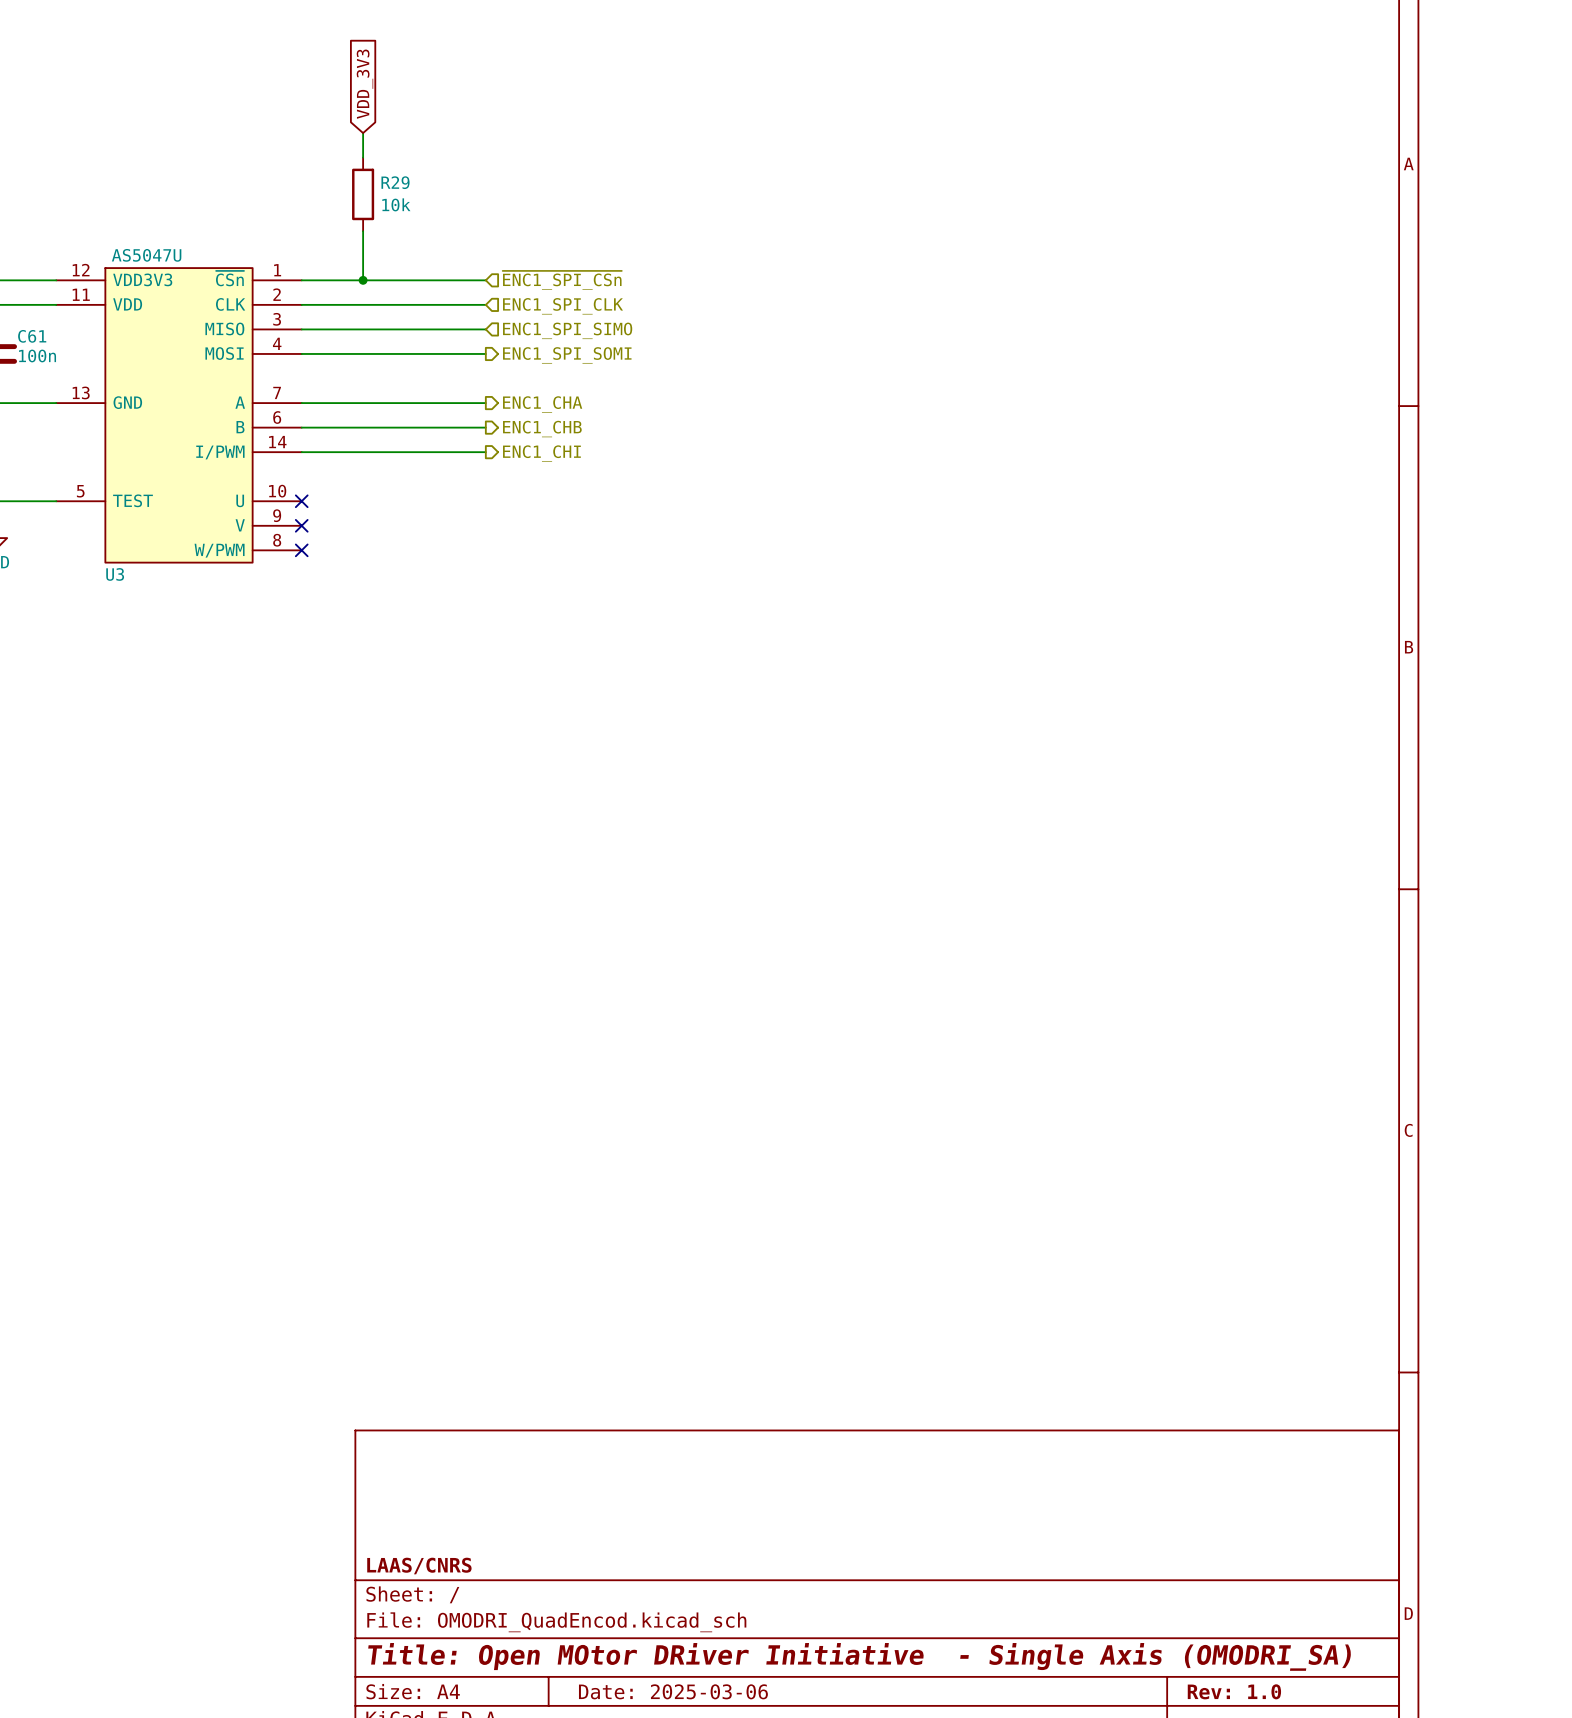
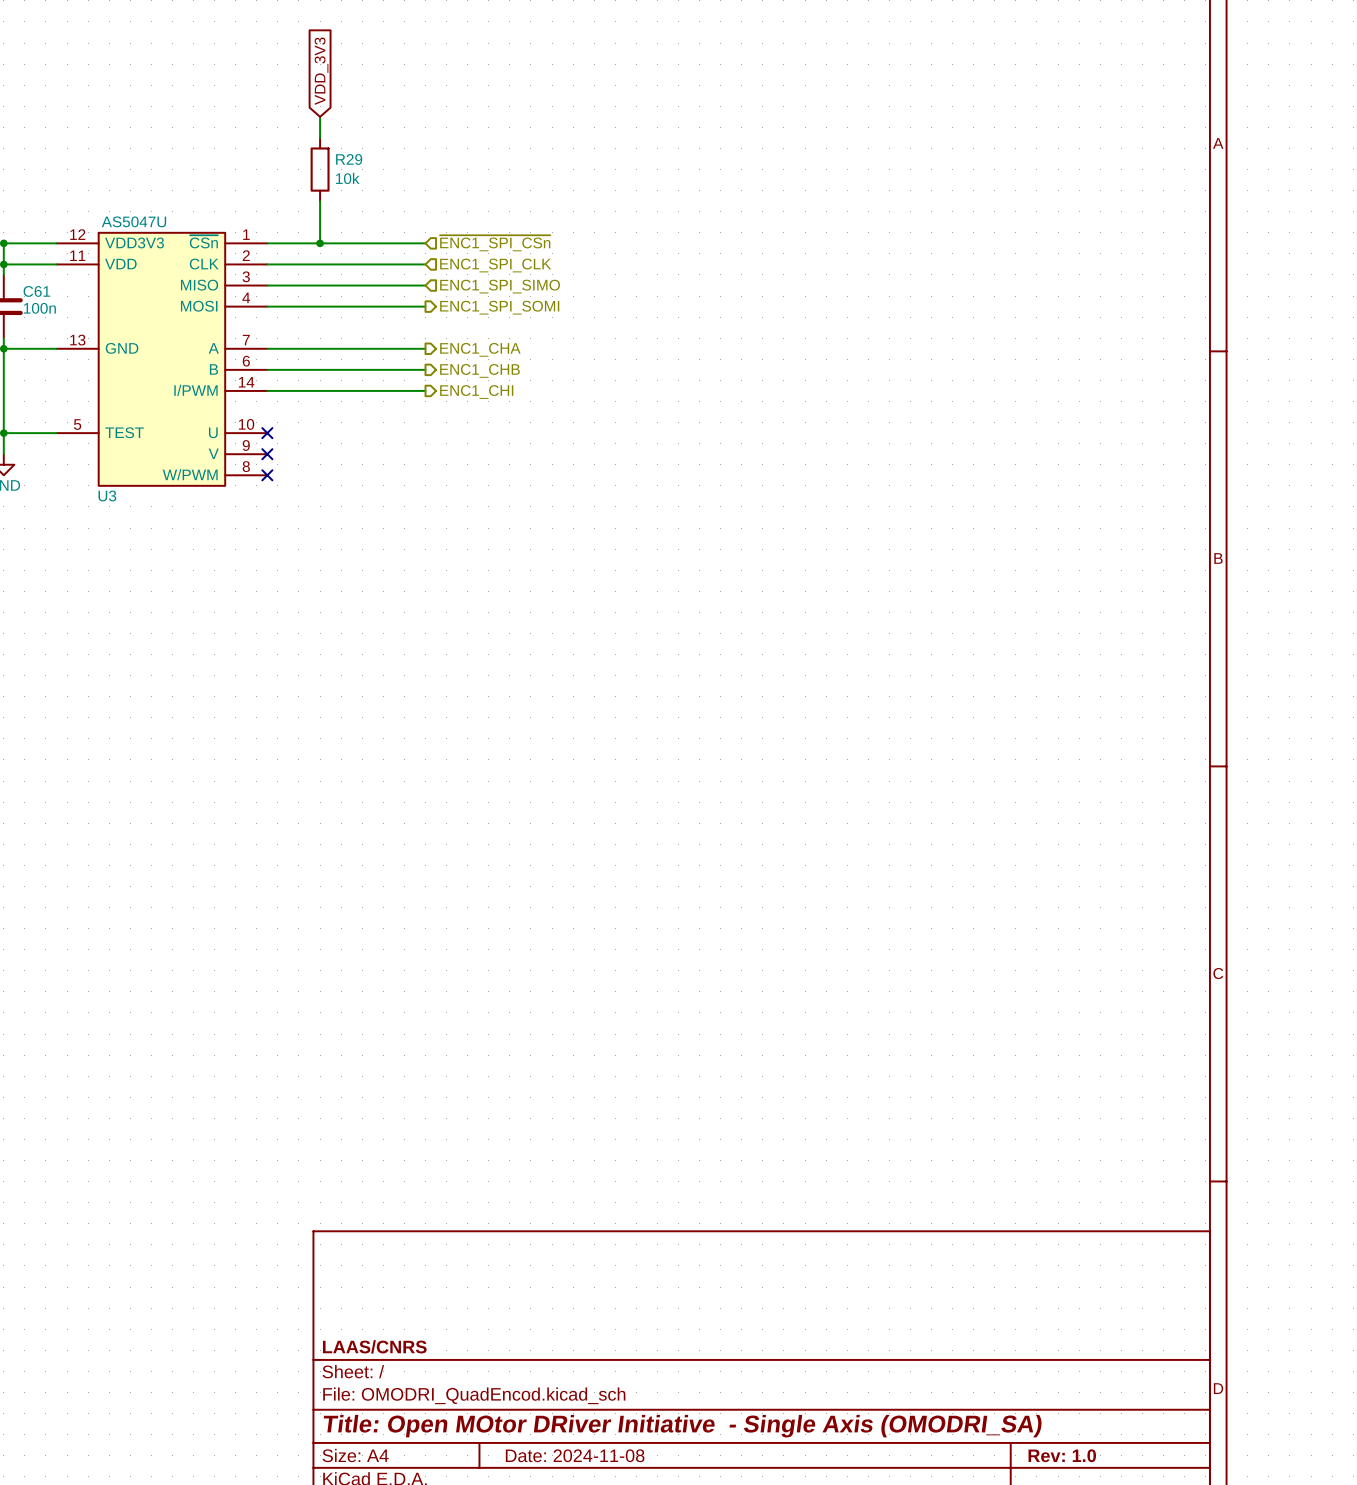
title block: Date: 2025-03-06 (673, 1691) -> Date: 2024-11-08 (575, 1455)

